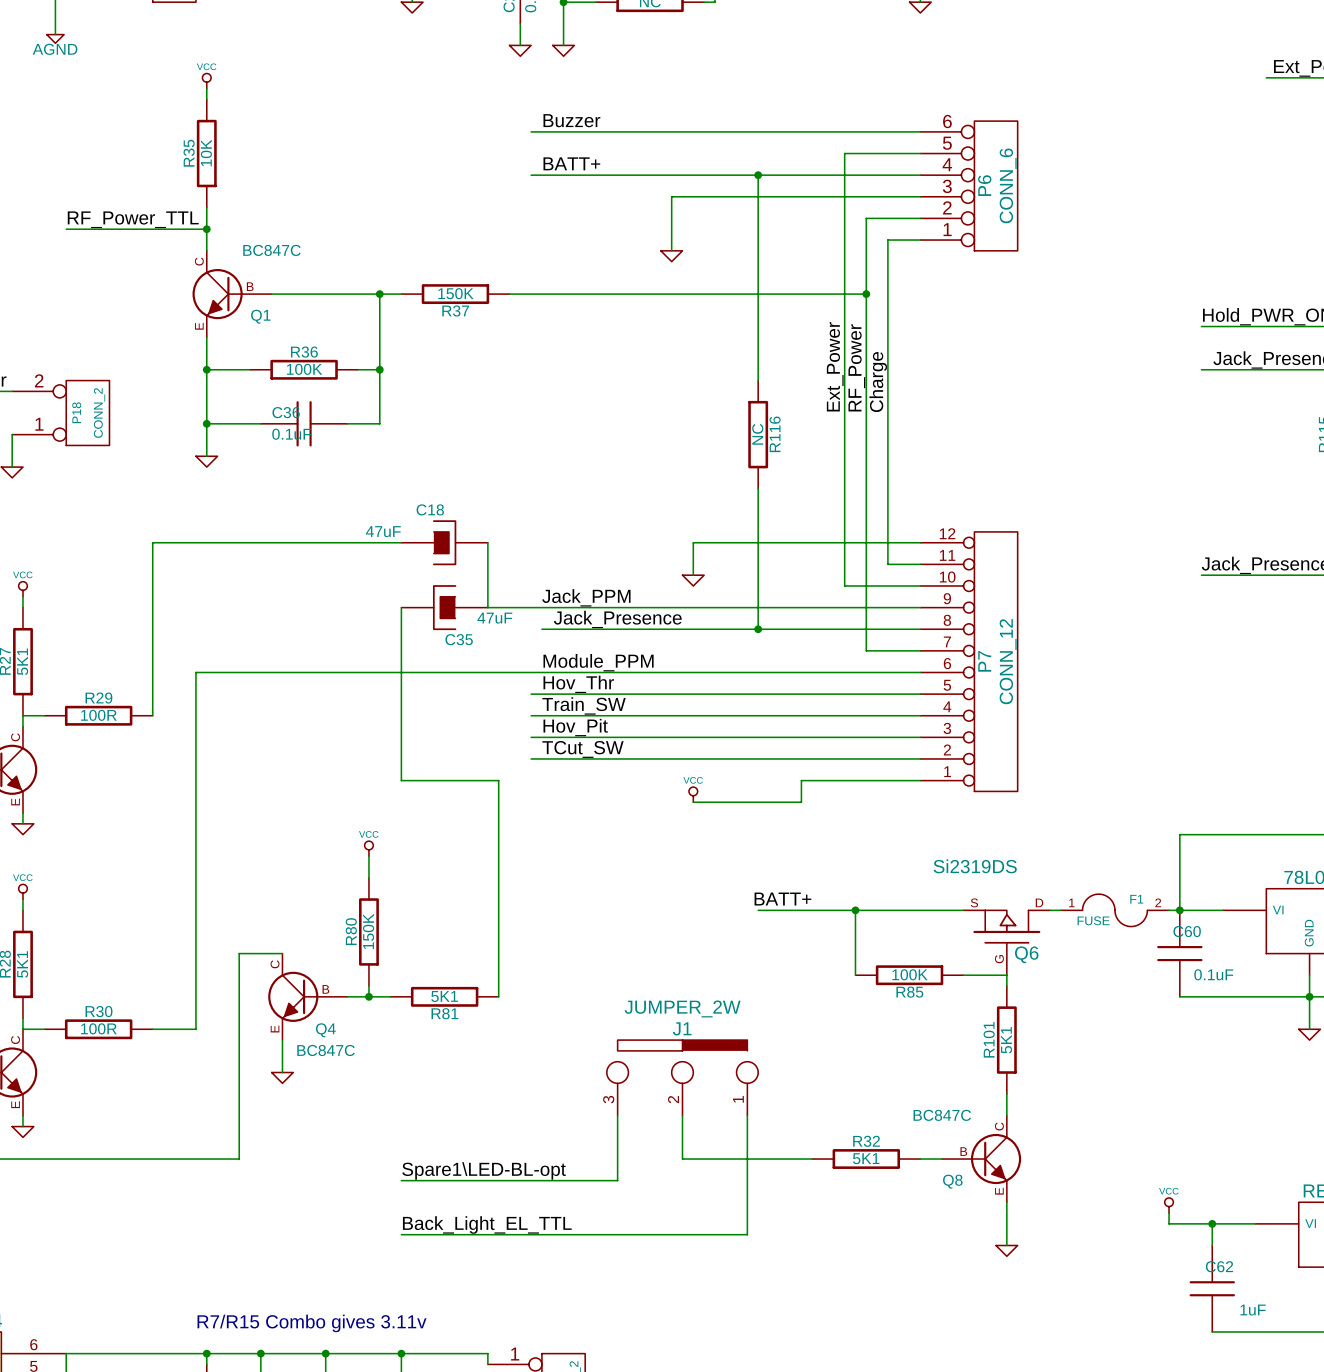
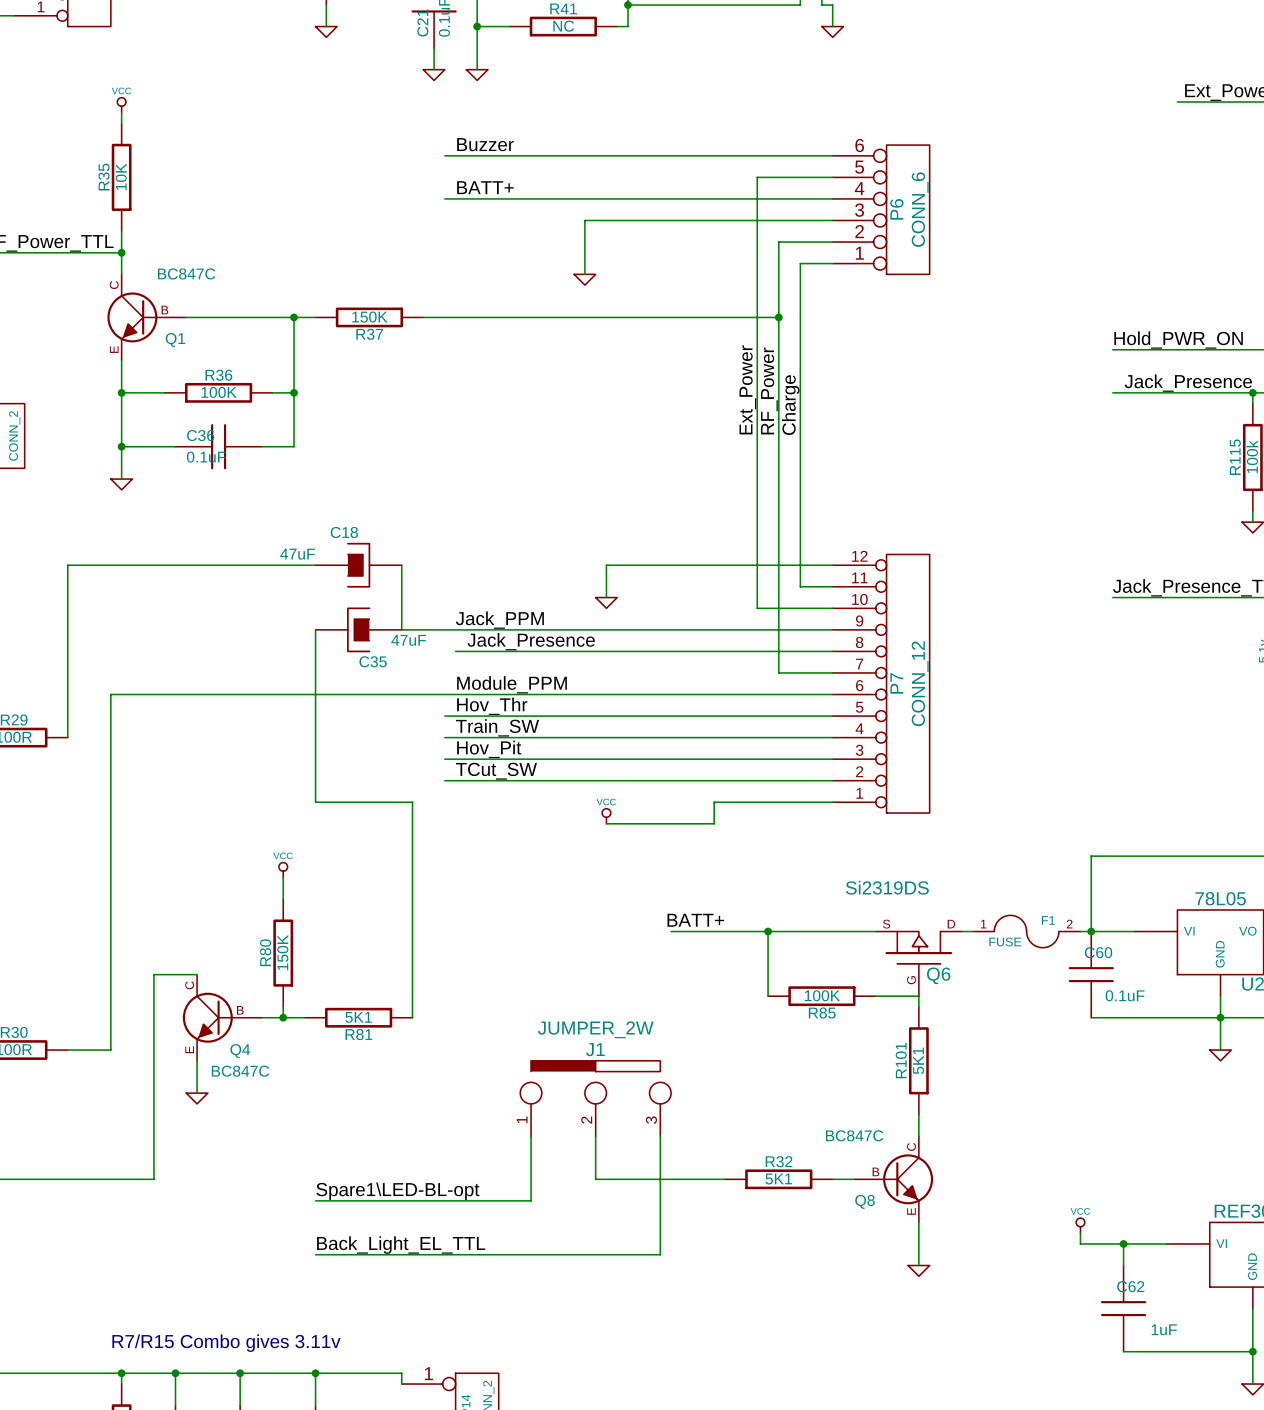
wire: (758, 175) (758, 380) -> none
junction: (758, 175) -> none
R116: NC (758, 434) -> none
wire: (758, 488) (758, 629) -> none
junction: (758, 629) -> none
J1 flip: as is (682, 1061) -> left-right (595, 1082)

